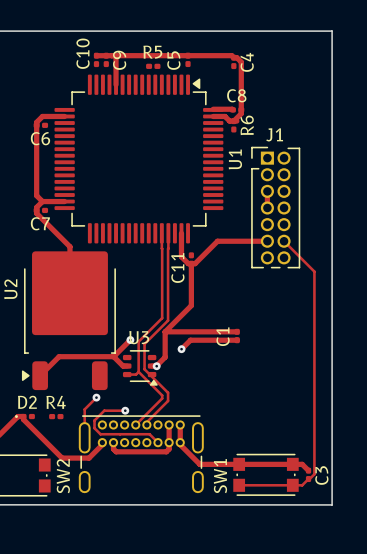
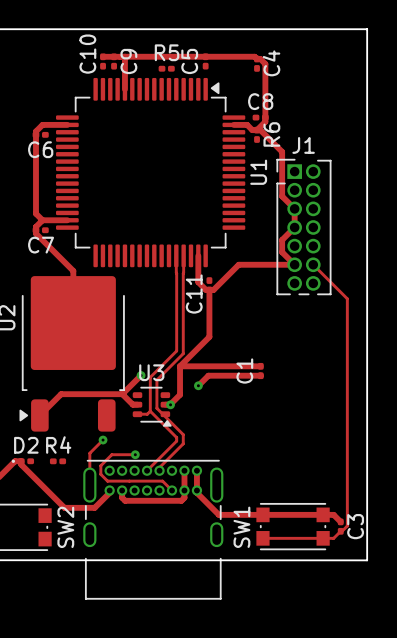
track: (213, 109) (232, 109) -> none
track: none -> (260, 130) (282, 151) (282, 196) (294, 208)
track: none -> (294, 227) (282, 239) (282, 252) (294, 264)
part: none -> (153, 529)

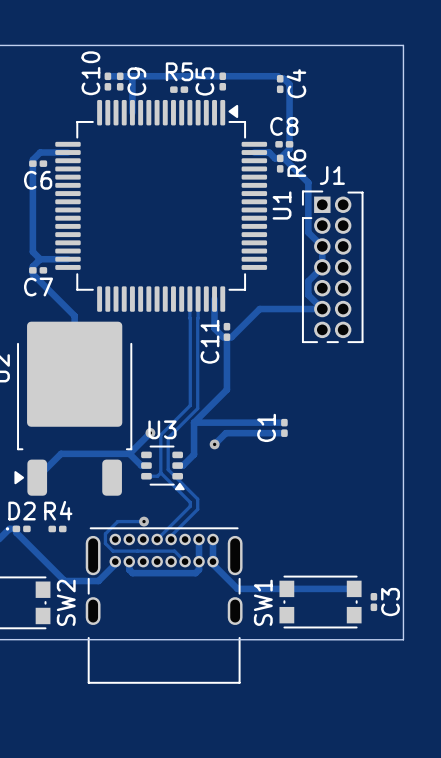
track: (313, 264) (347, 298) (347, 526) (333, 538) (262, 538) -> none
via: (170, 404) -> none
track: (103, 440) (89, 453) (89, 485) -> none
via: (103, 440) -> none
track: (323, 514) (333, 514) (340, 521) -> none

